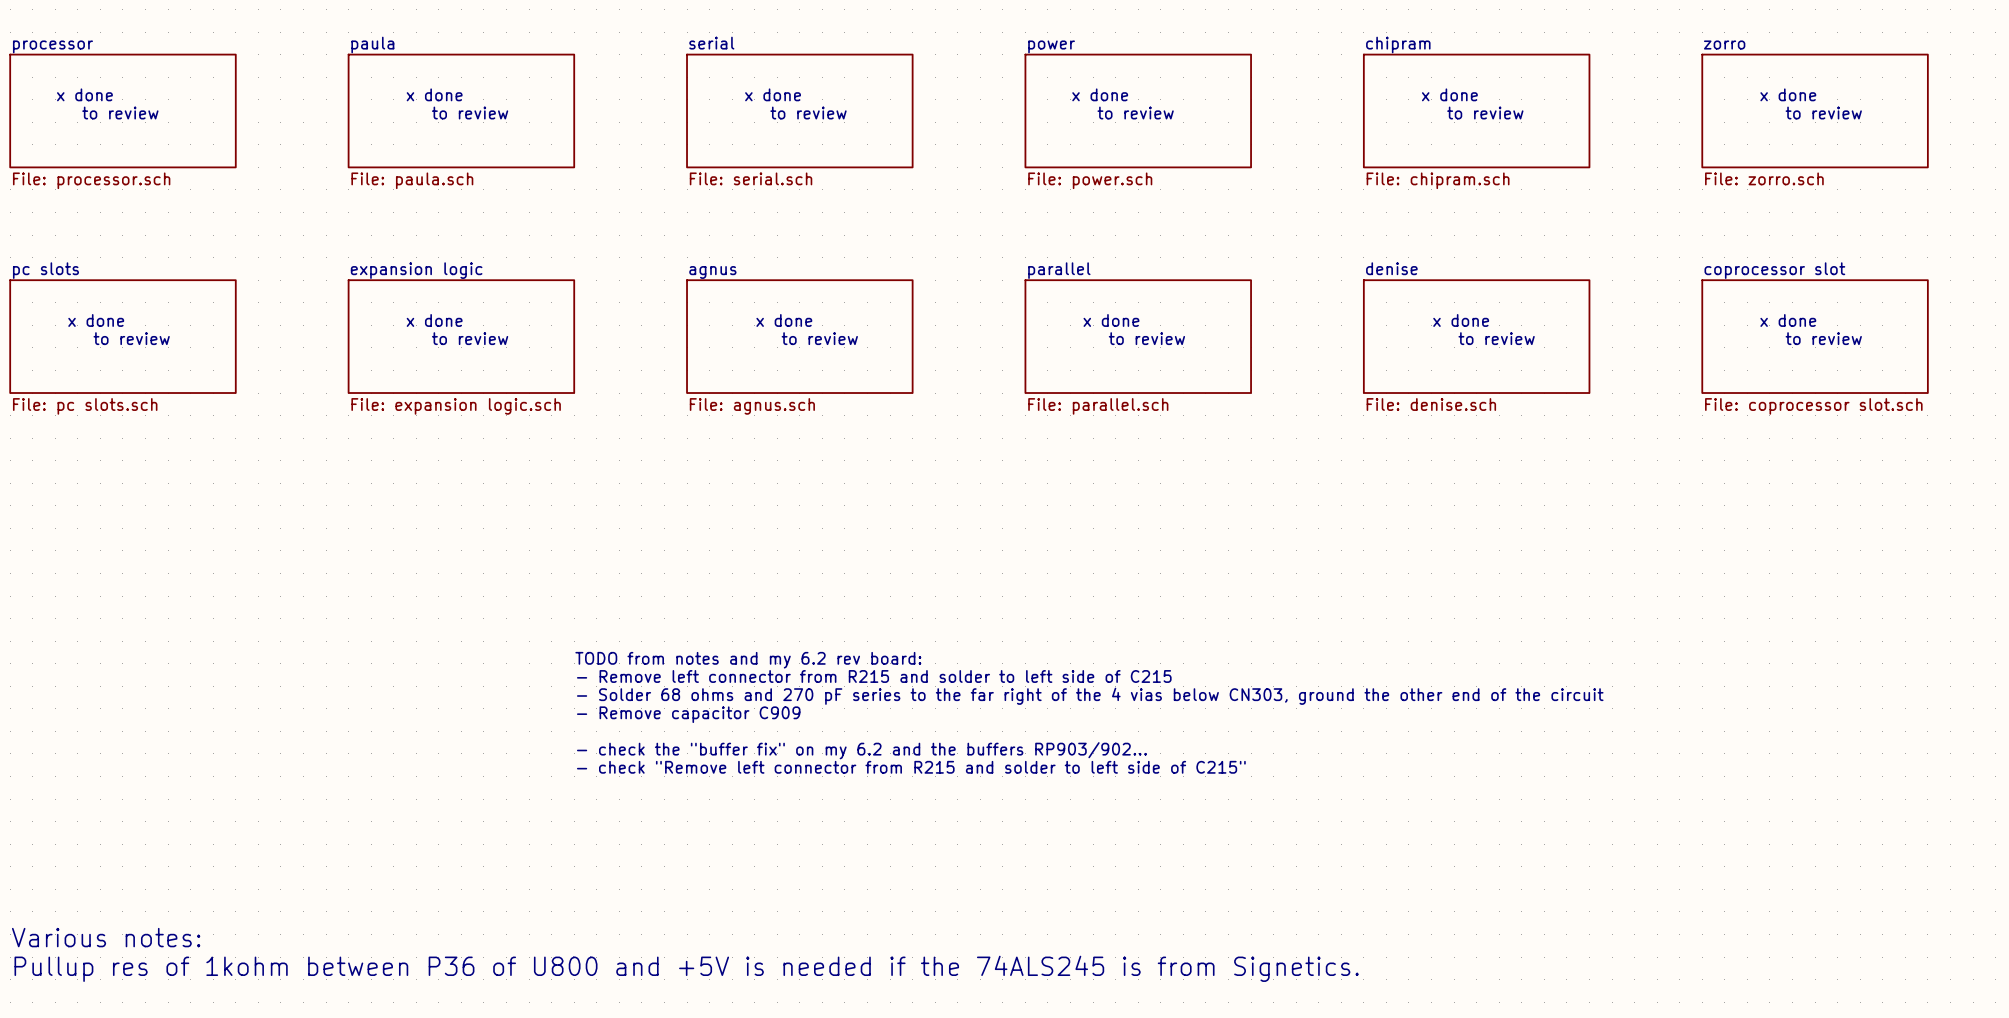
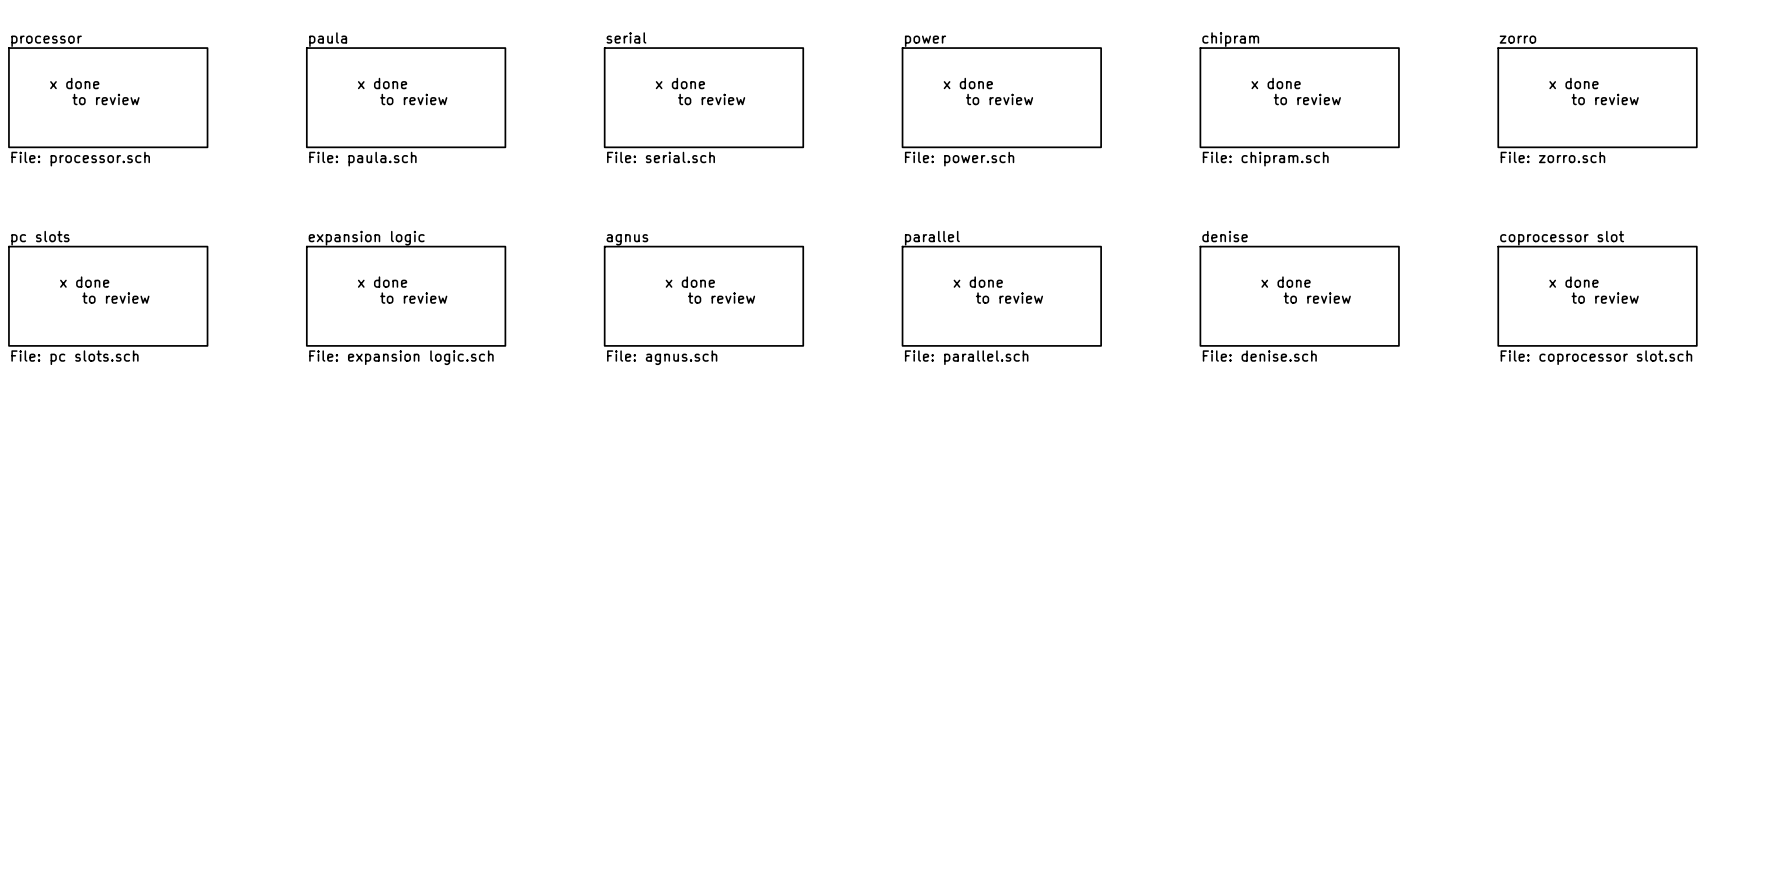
text: TODO from notes and my 6.2 rev board: (748, 660) -> none
text: - Remove left connector from R215 and solder to left side of C215 (874, 676) -> none
text: - Solder 68 ohms and 270 pF series to the far right of the 4 vias below CN303, ground the other end of the circuit (1090, 696) -> none
text: - Remove capacitor C909 (688, 714) -> none
text: - check the "buffer fix" on my 6.2 and the buffers RP903/902... (861, 750) -> none
text: - check "Remove left connector from R215 and solder to left side of C215" (911, 767) -> none
text: Various notes: (106, 937) -> none
text: Pullup res of 1kohm between P36 of U800 and +5V is needed if the 74ALS245 is from Signetics. (686, 968) -> none

